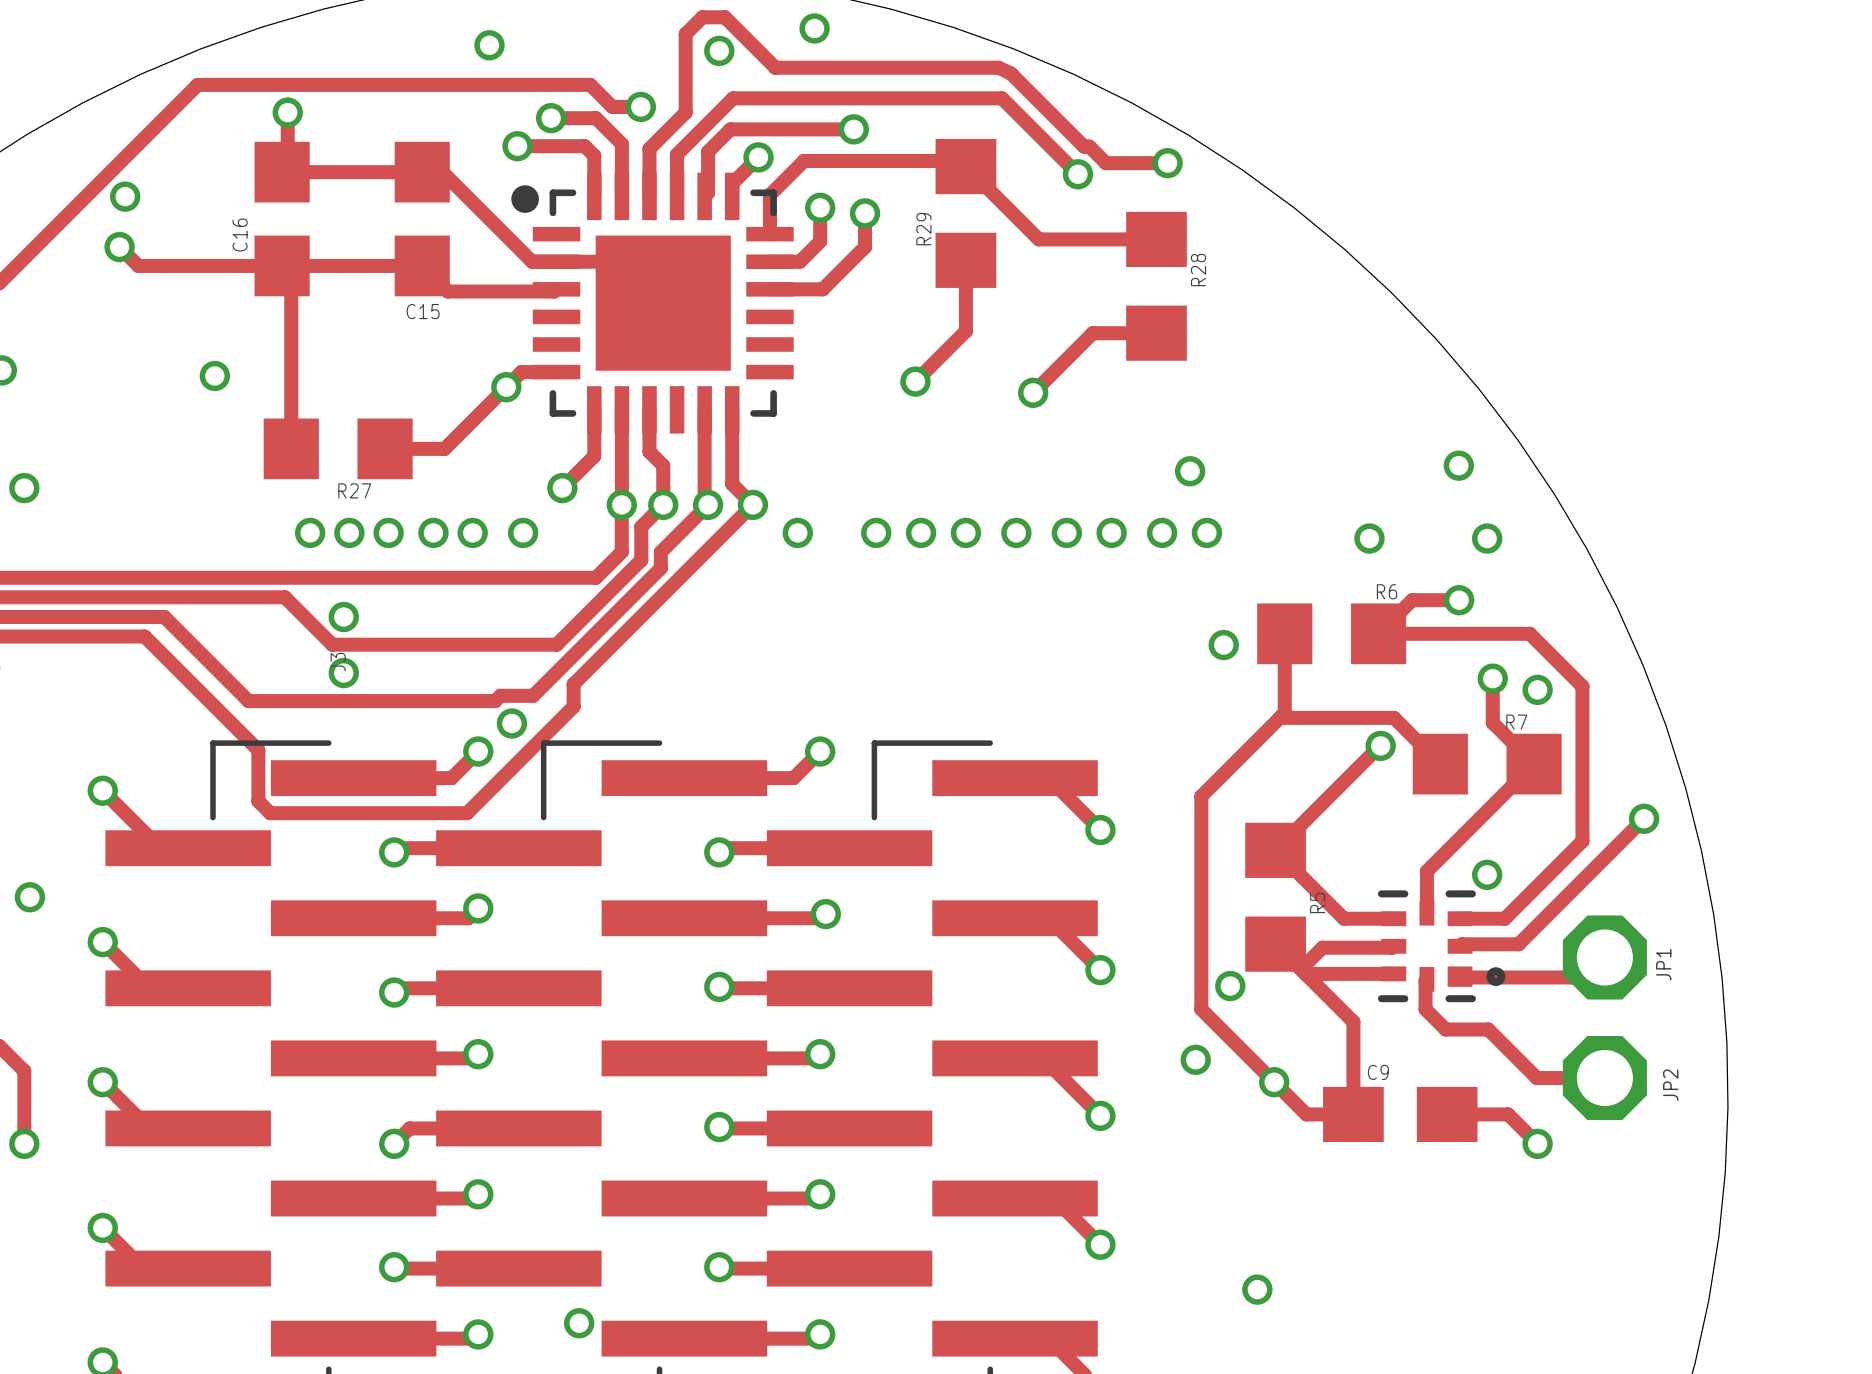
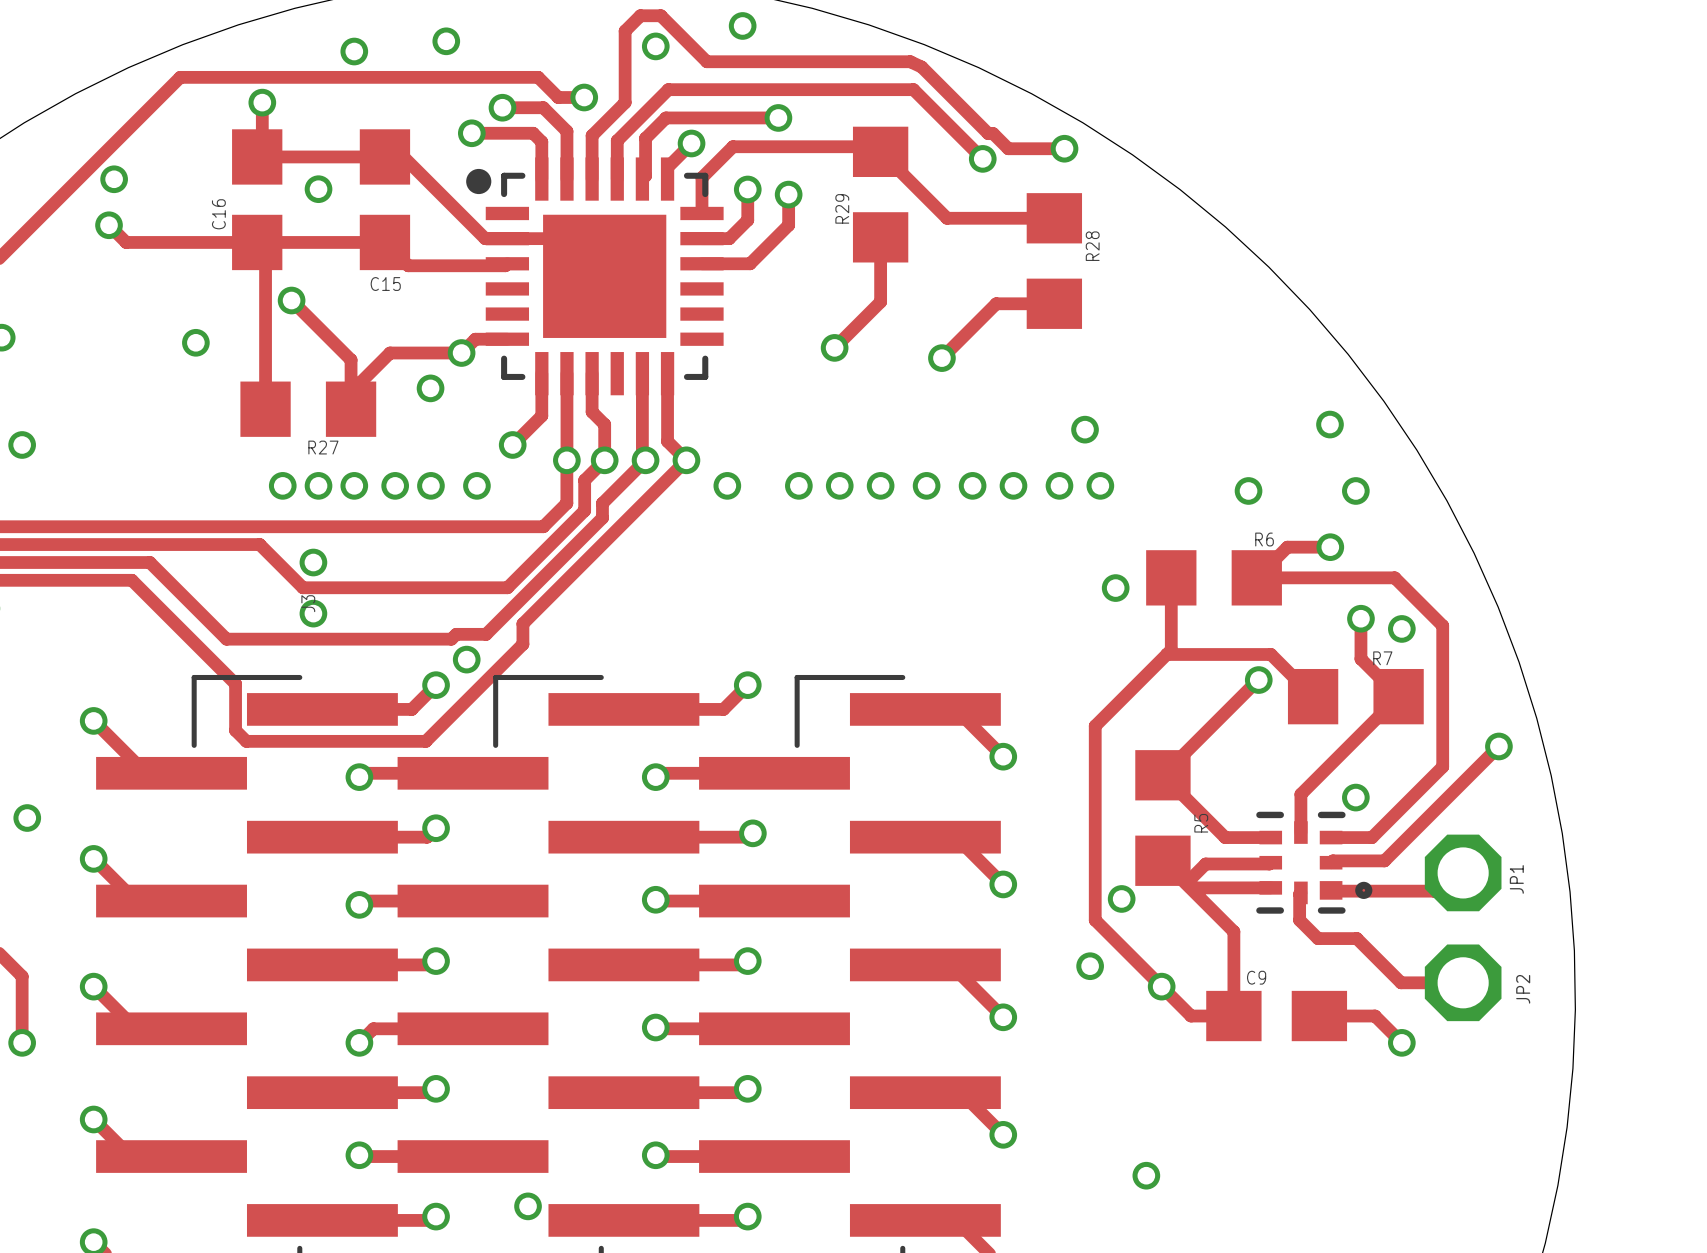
via: none -> (354, 51)
via: none -> (318, 189)
track: none -> (291, 300) (351, 359) (351, 409)
via: none -> (291, 300)
track: (506, 387) (444, 448) (385, 448) -> (461, 353) (390, 353) (351, 392)
via: none -> (430, 388)

